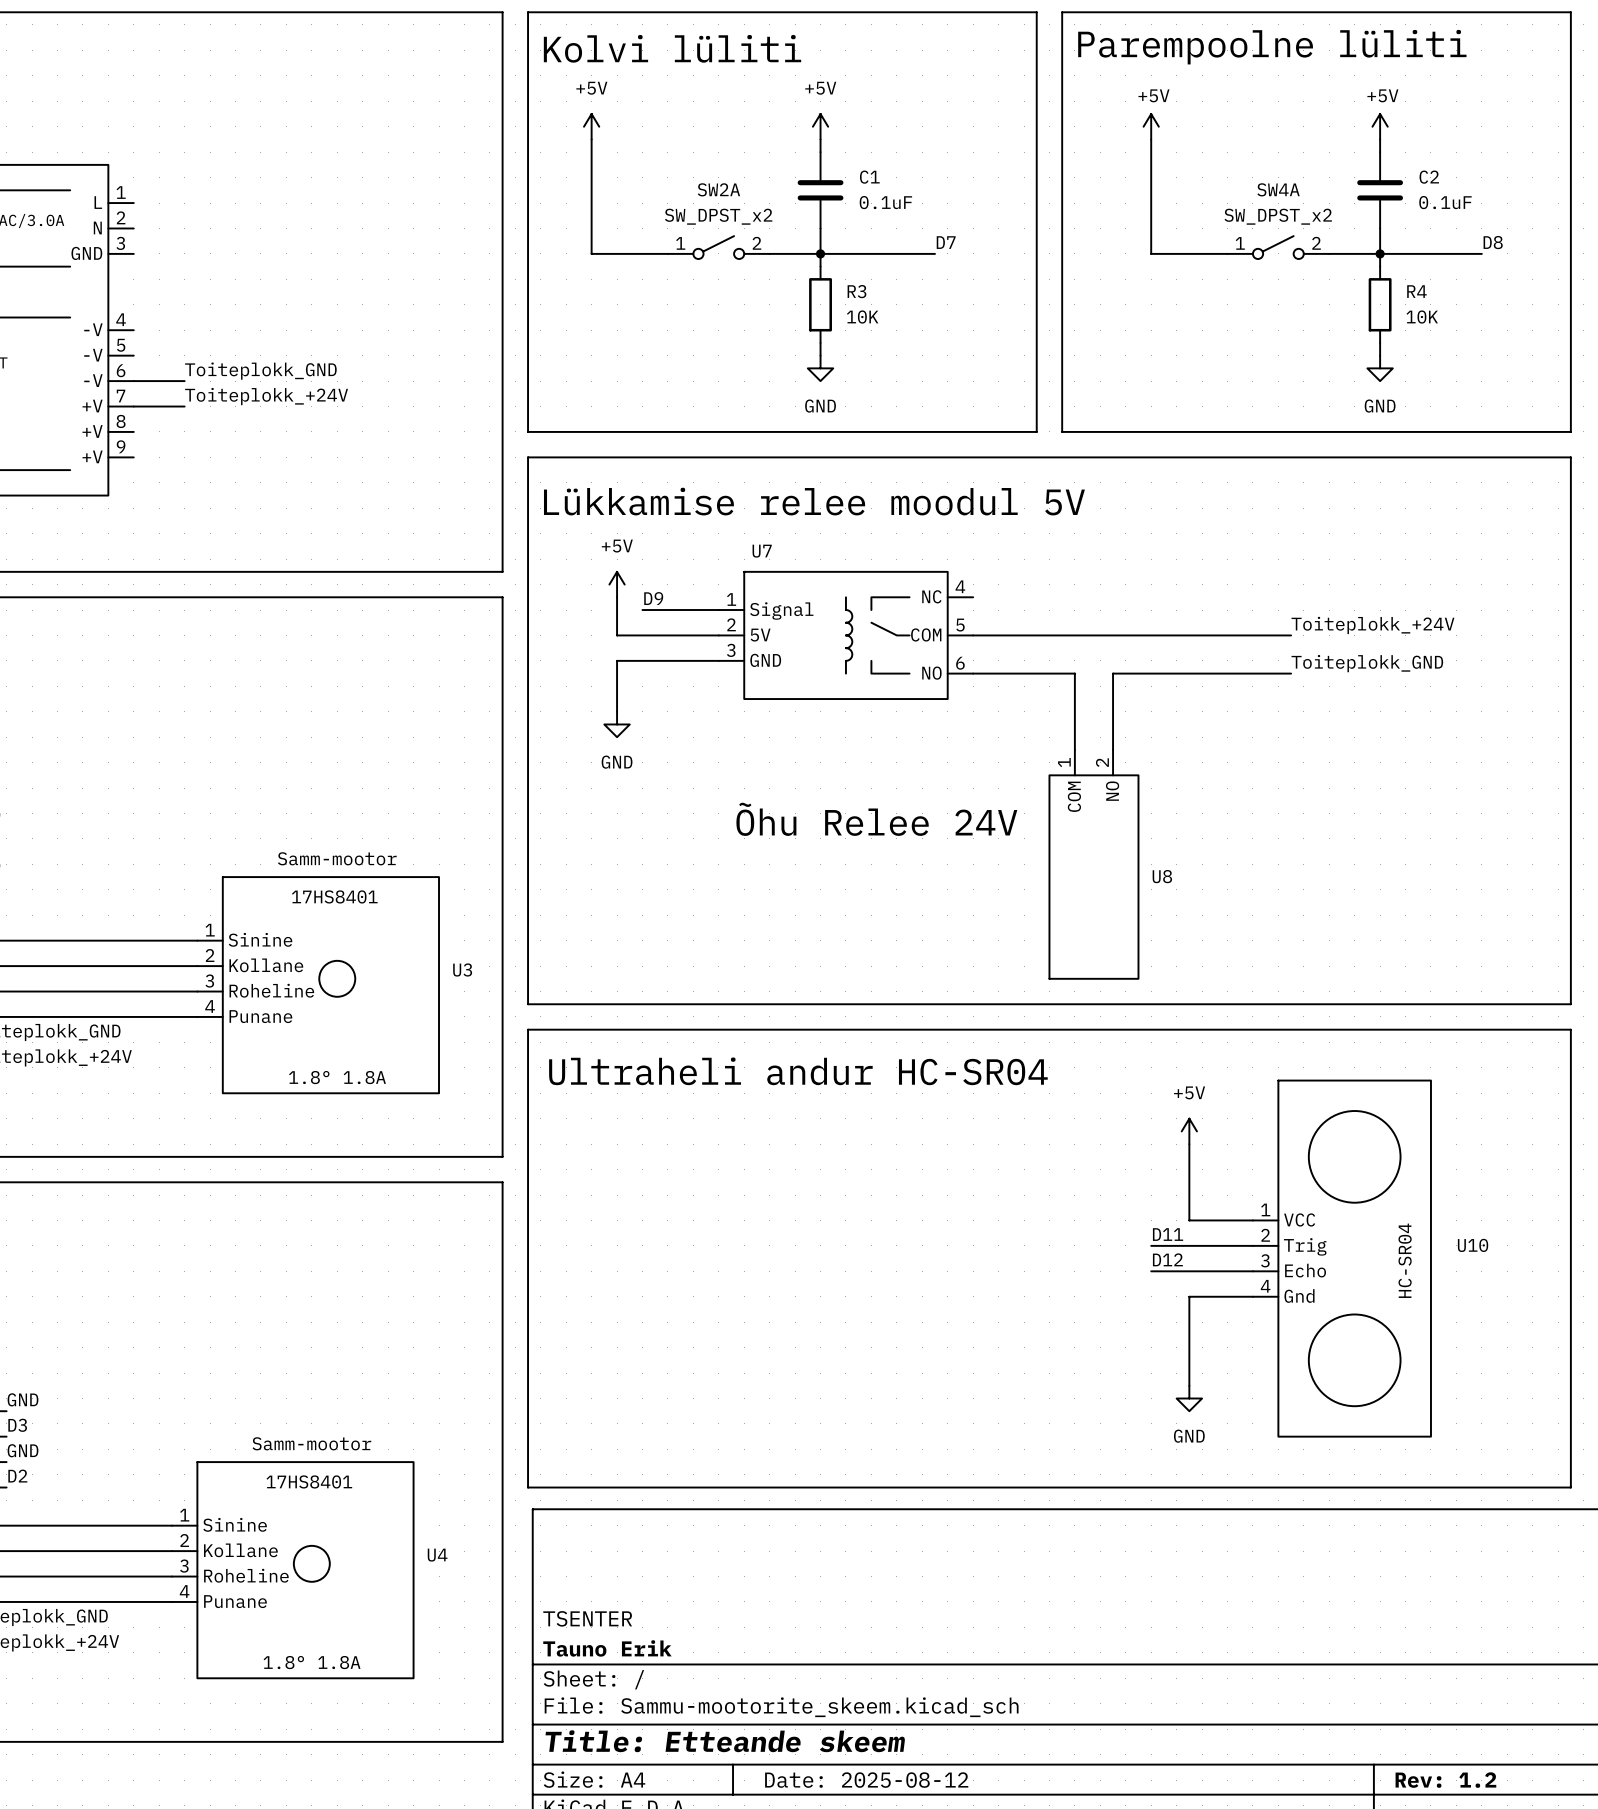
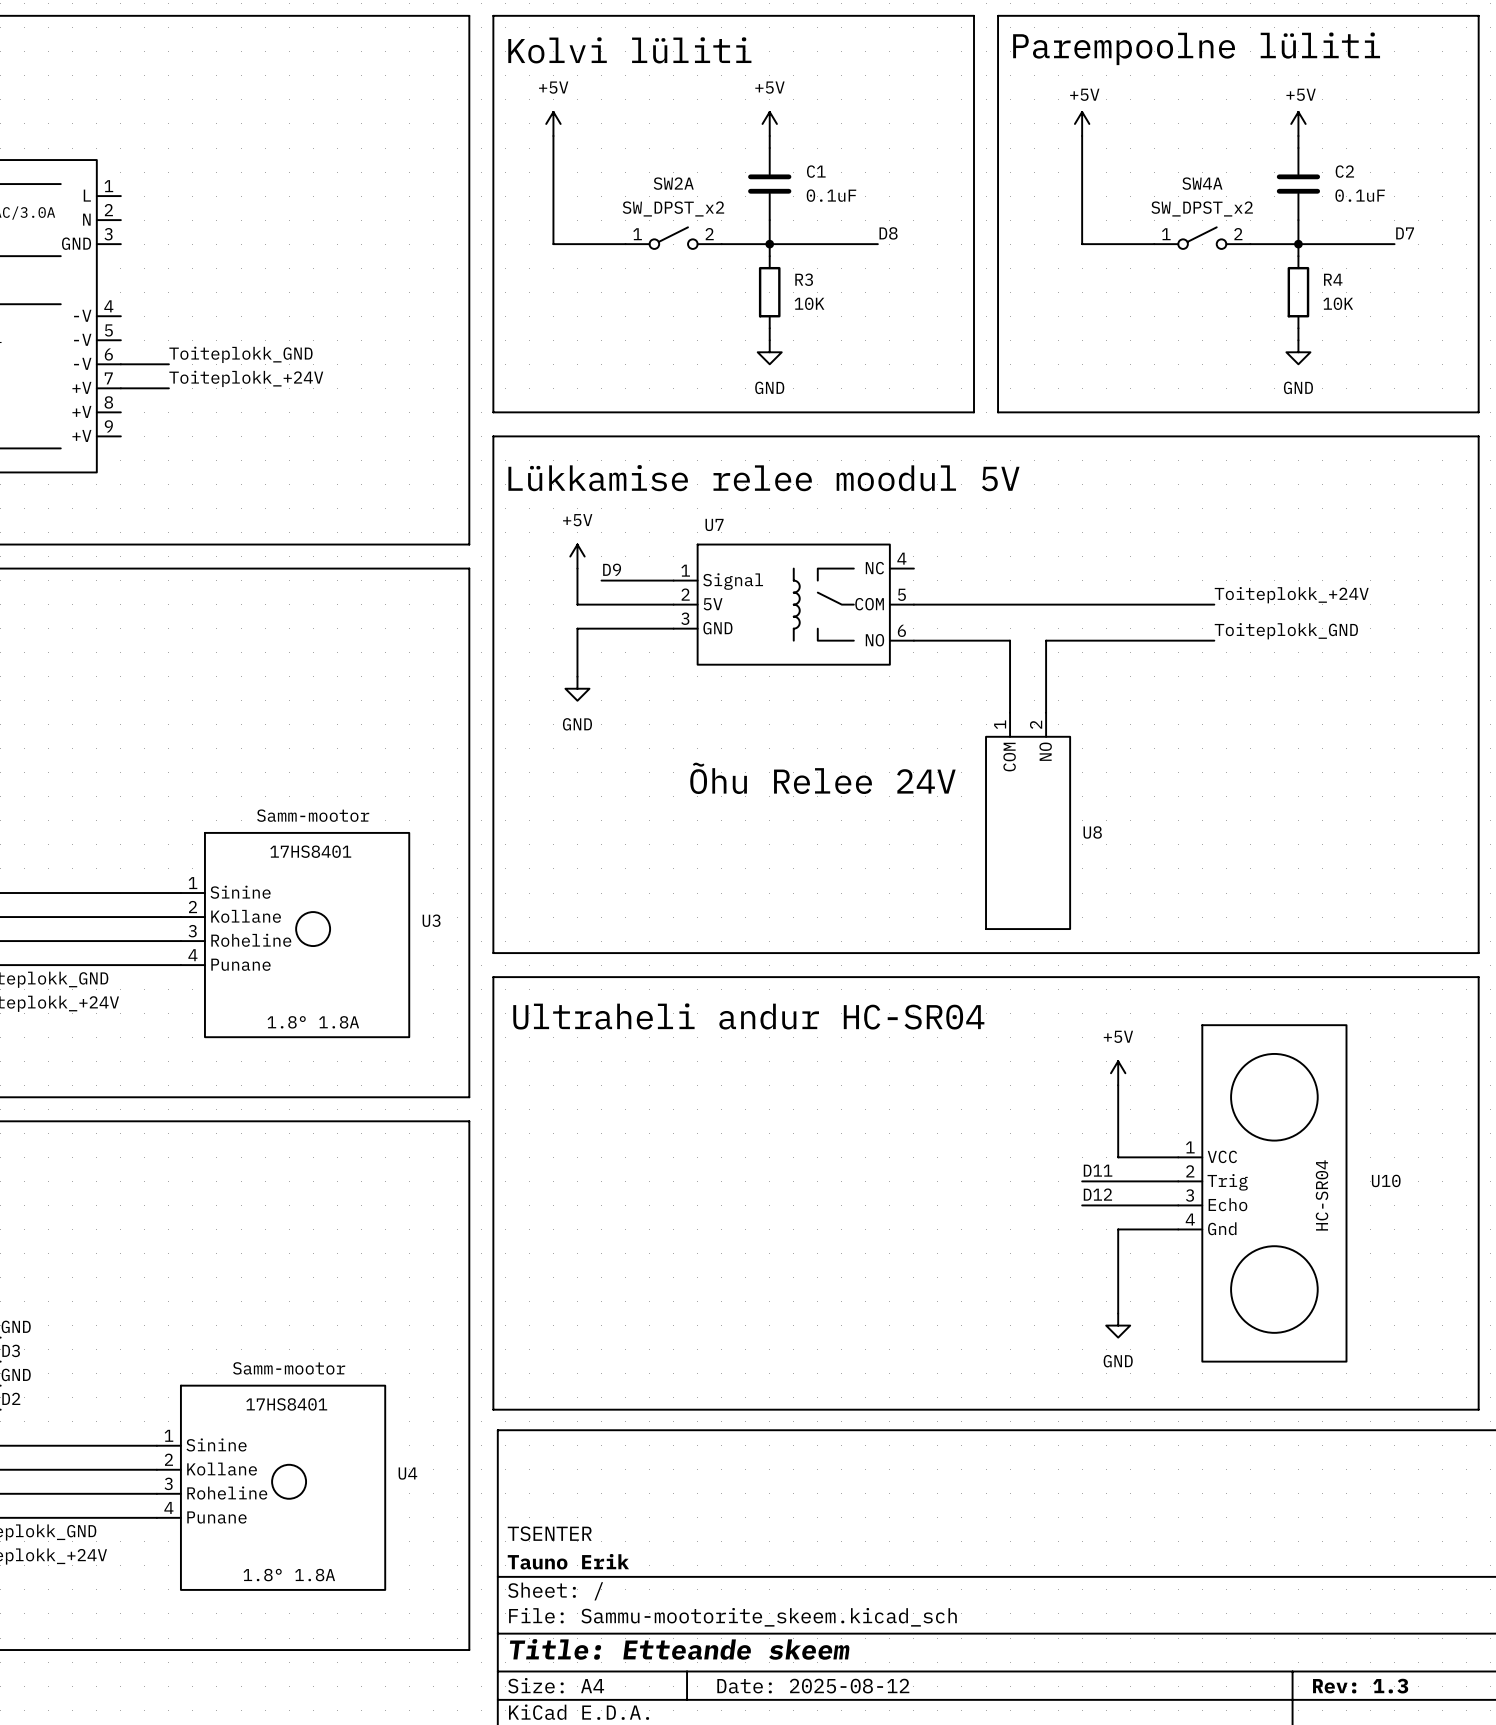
label: D7 (946, 242) -> D8 (888, 233)
label: D8 (1493, 242) -> D7 (1405, 233)
title block: Rev: 1.2 (1445, 1780) -> Rev: 1.3 (1360, 1686)

